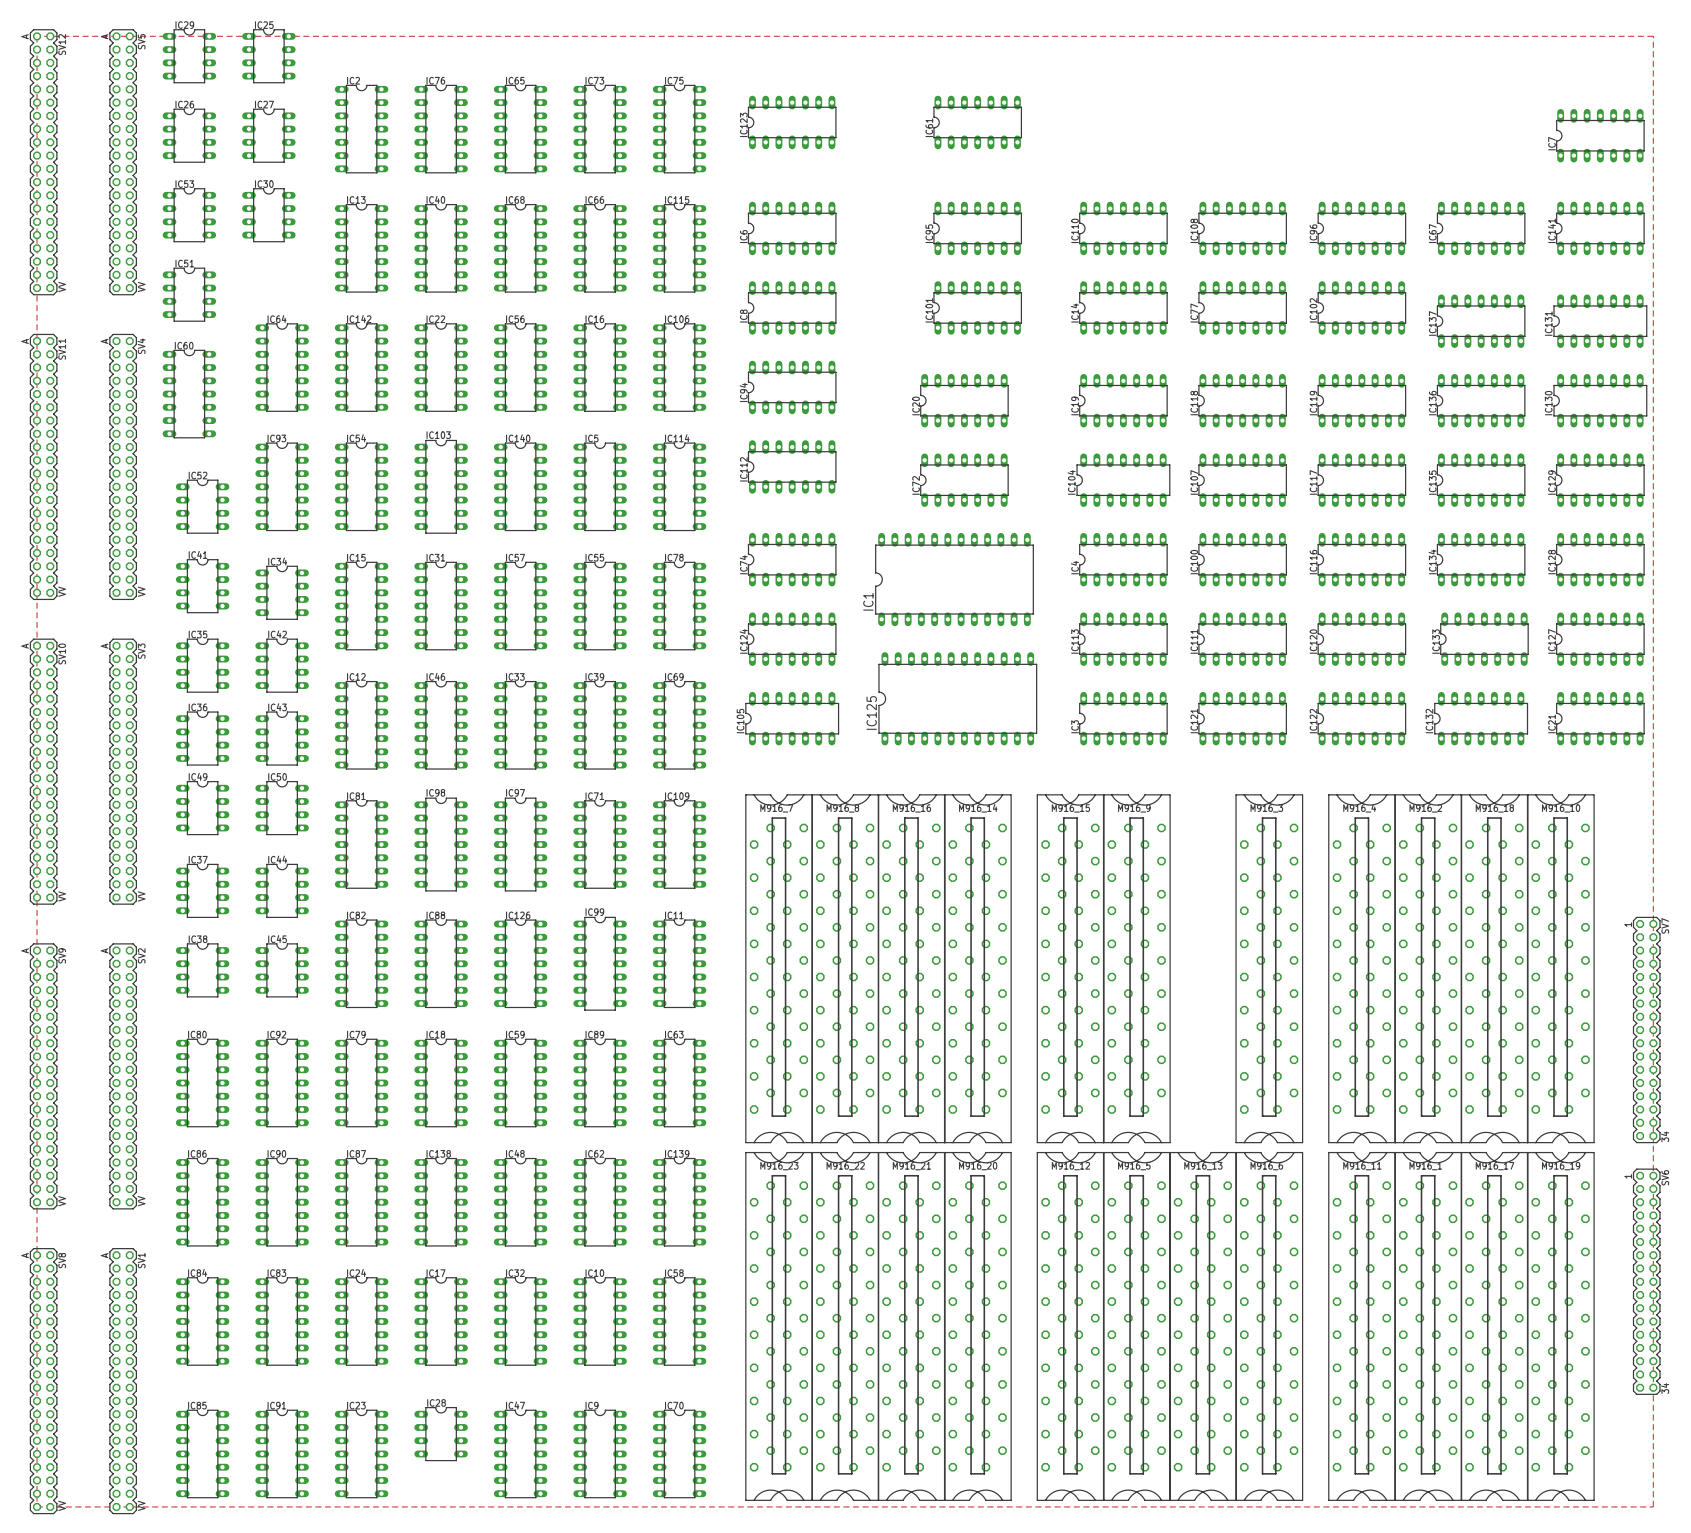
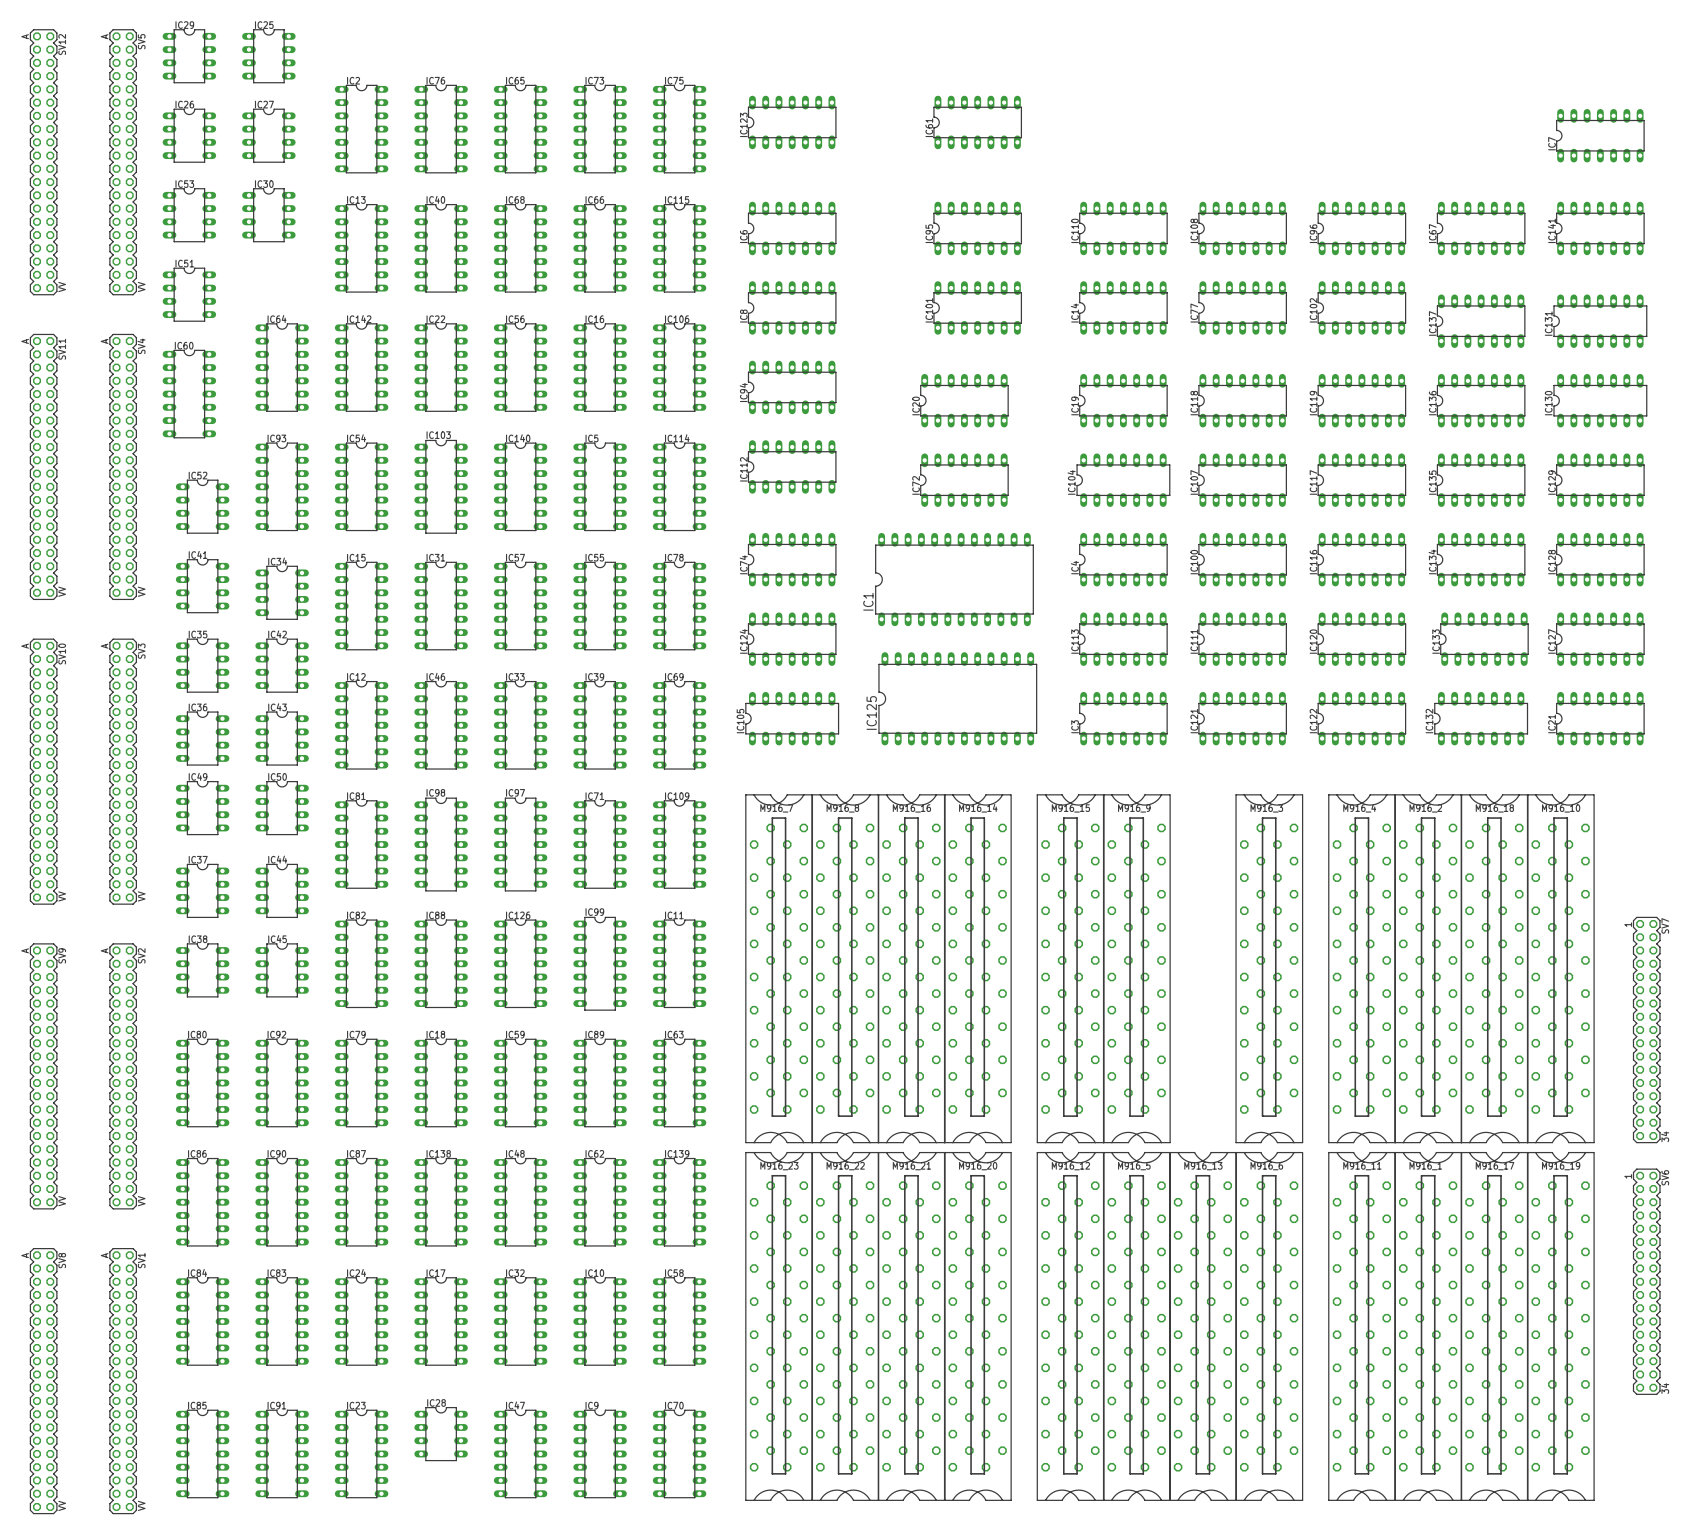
zone outline: (37, 36) (1653, 36) (1653, 1506) (37, 1506) (37, 36) -> none

